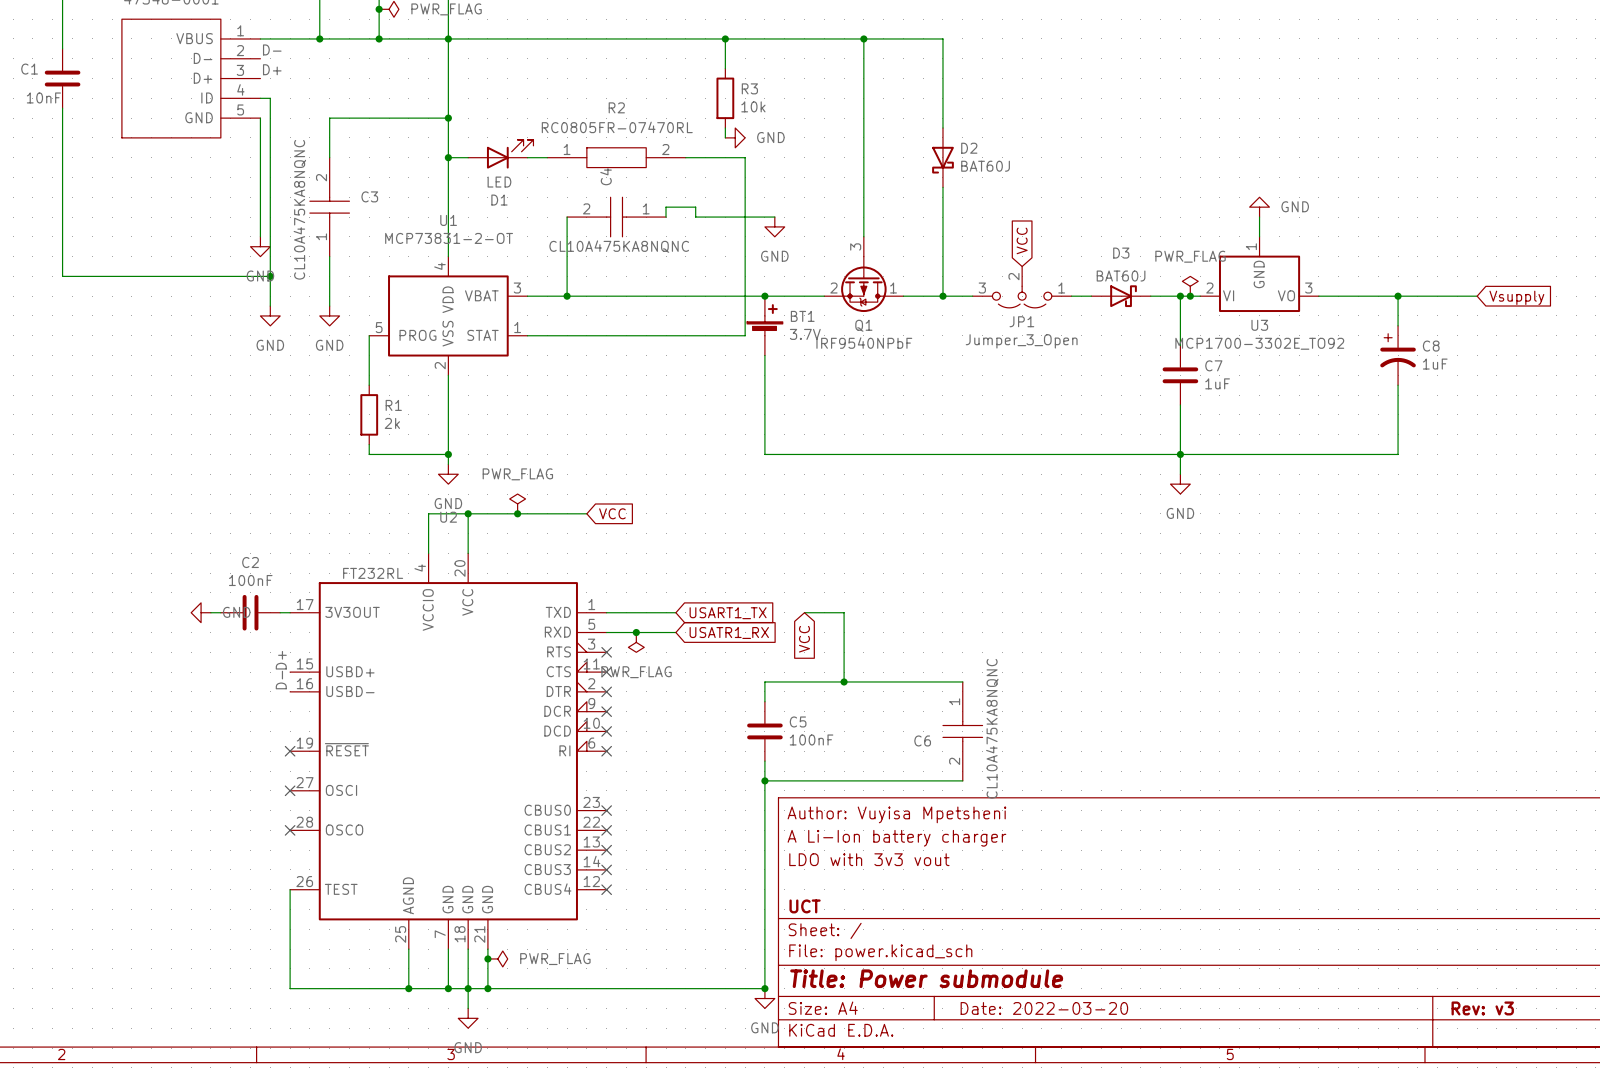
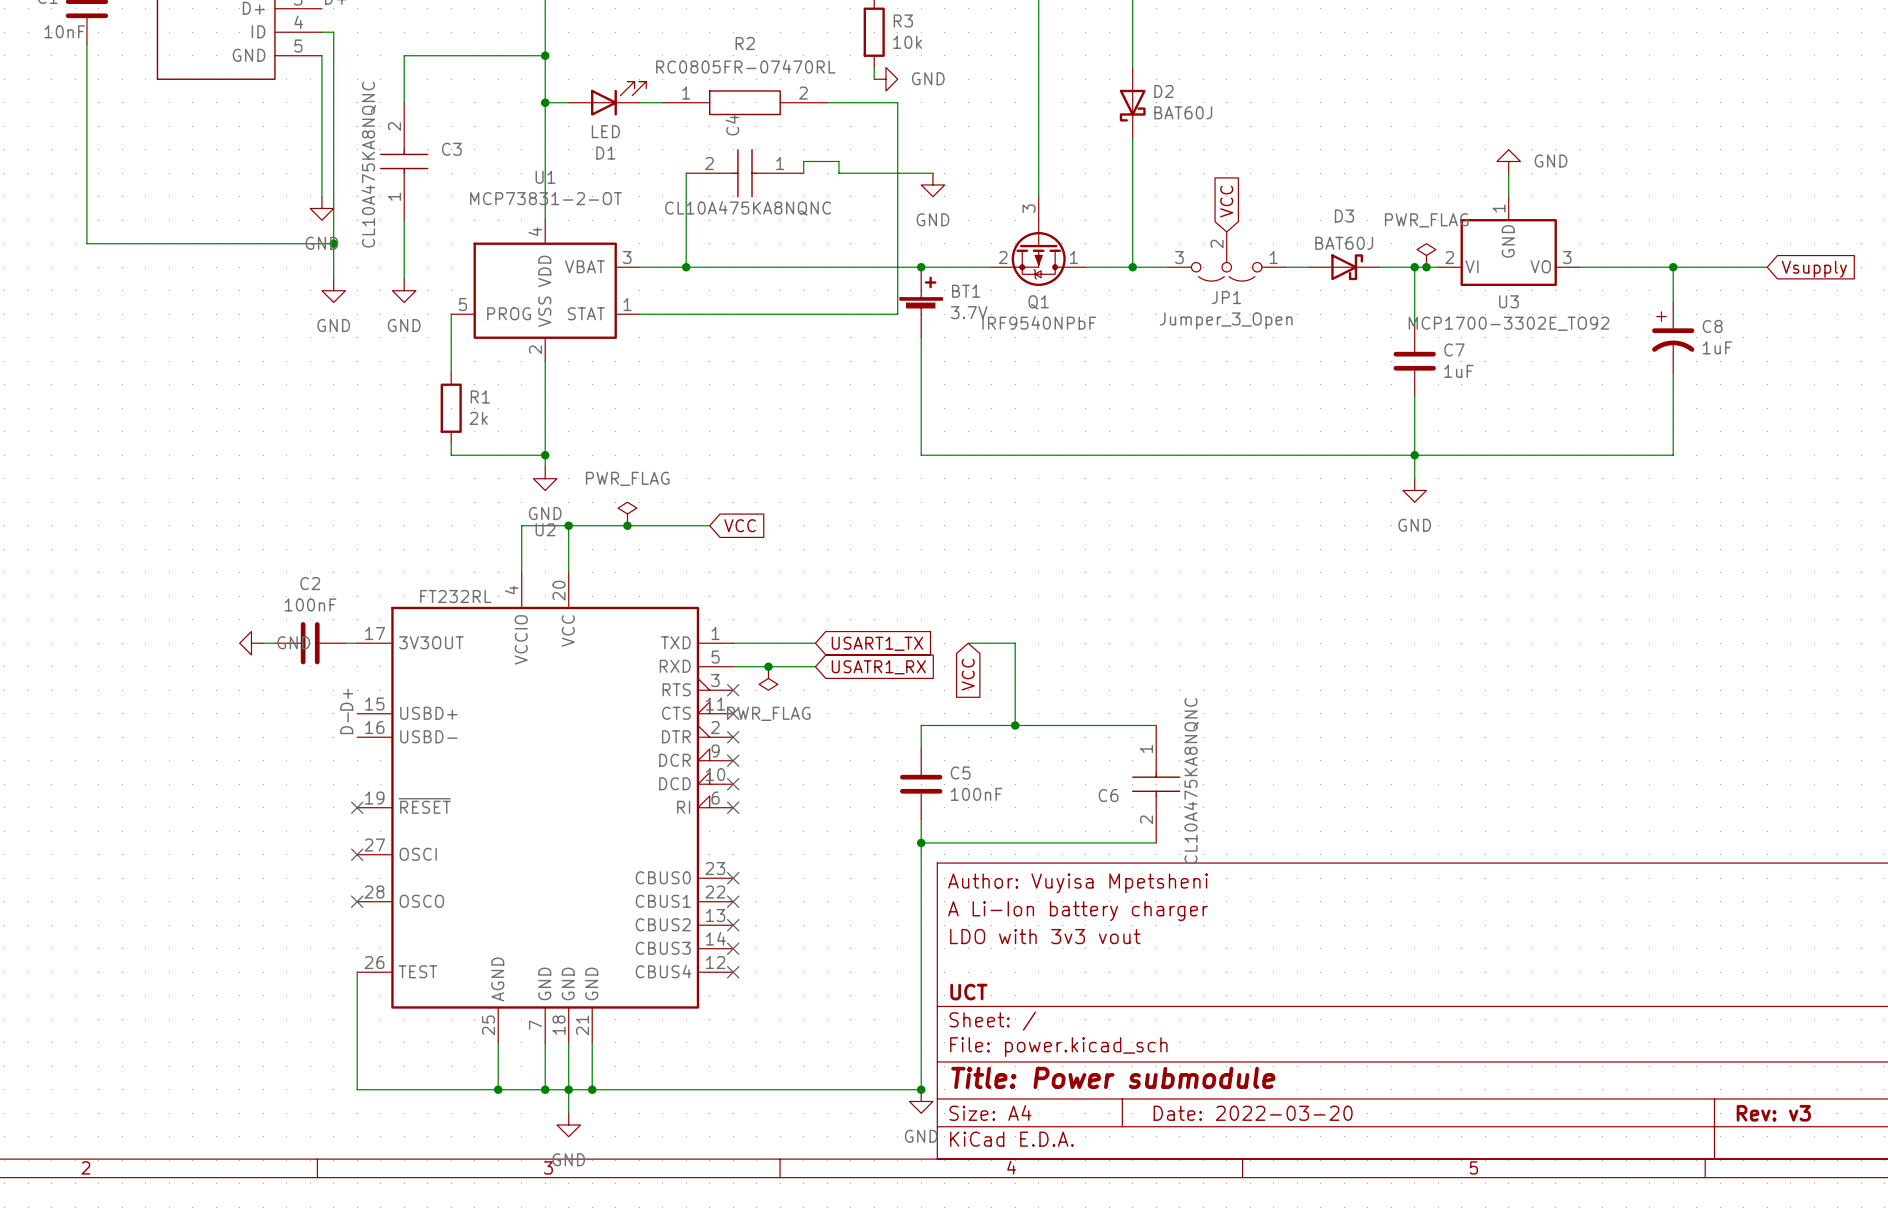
junction: (487, 958) -> none
power symbol: PWR_FLAG (497, 958) -> none

